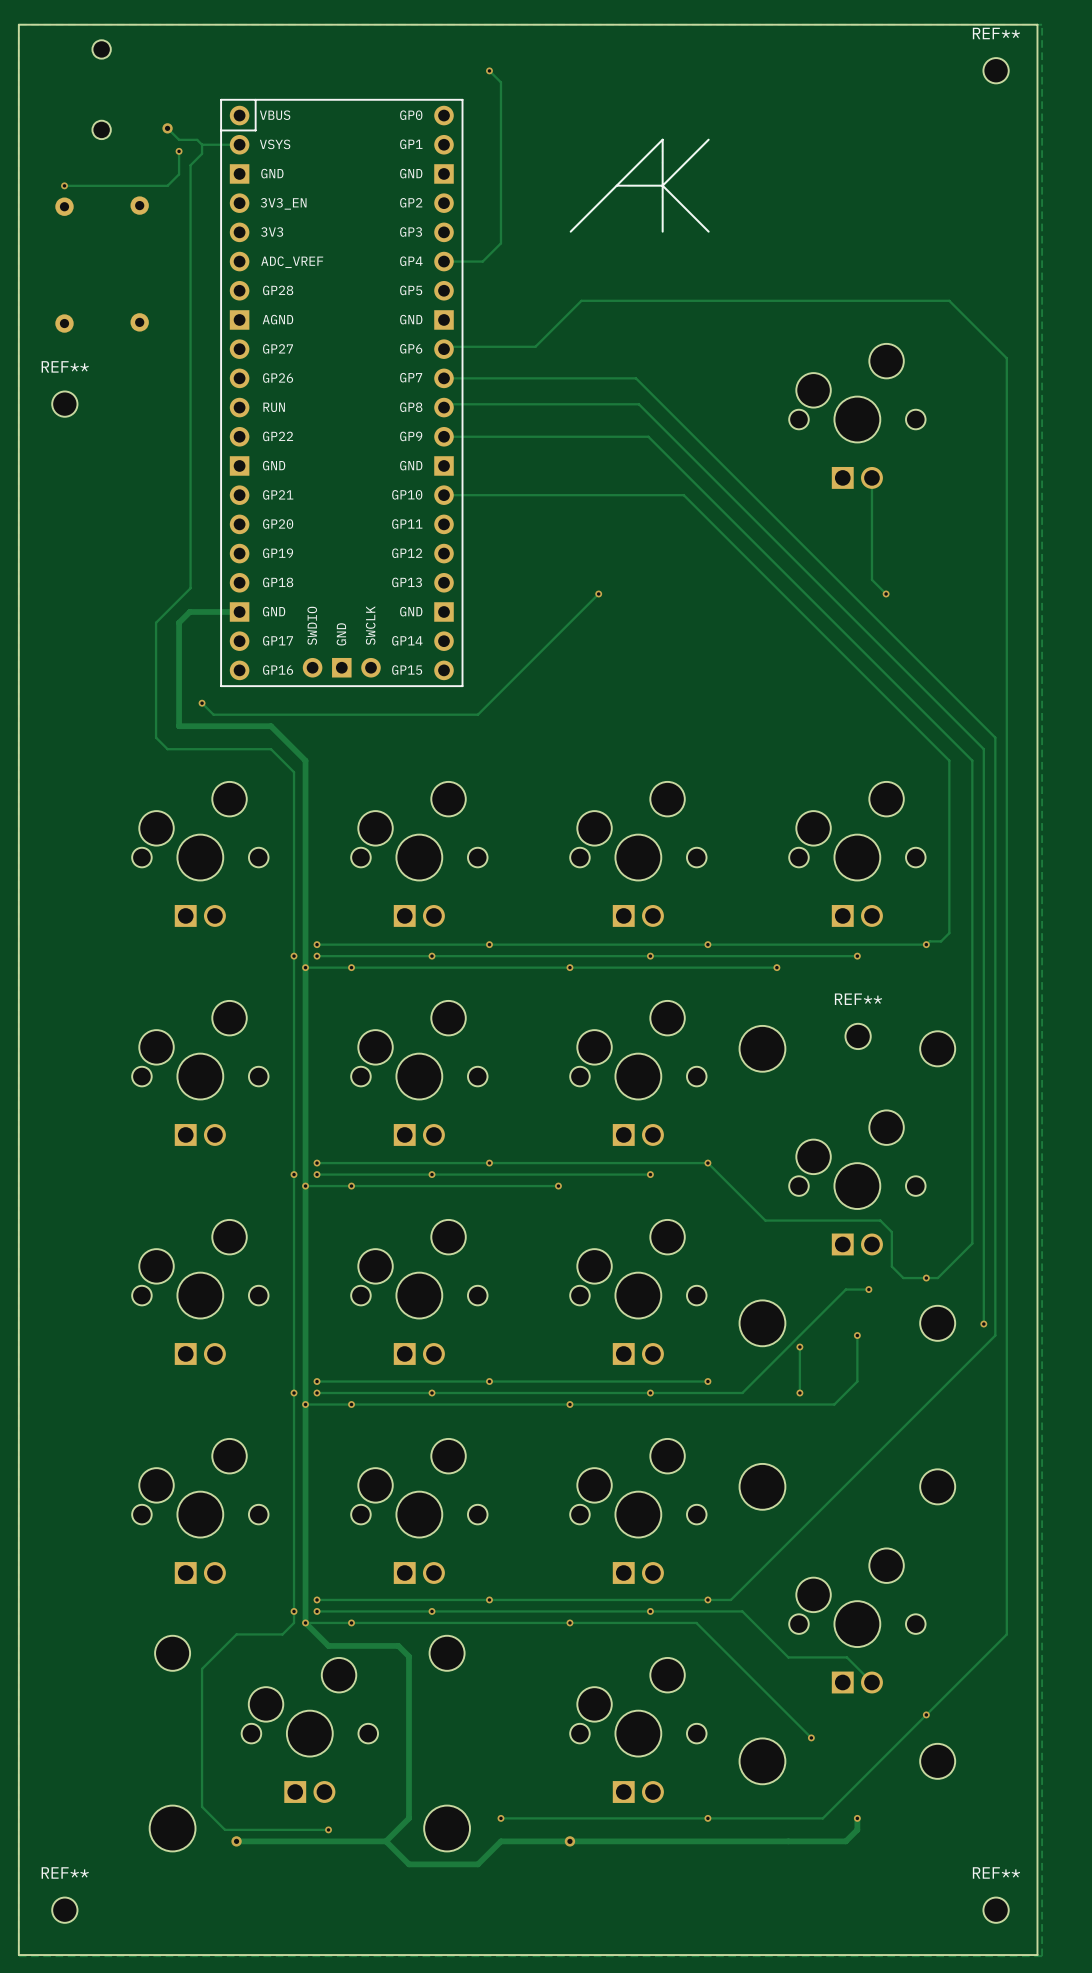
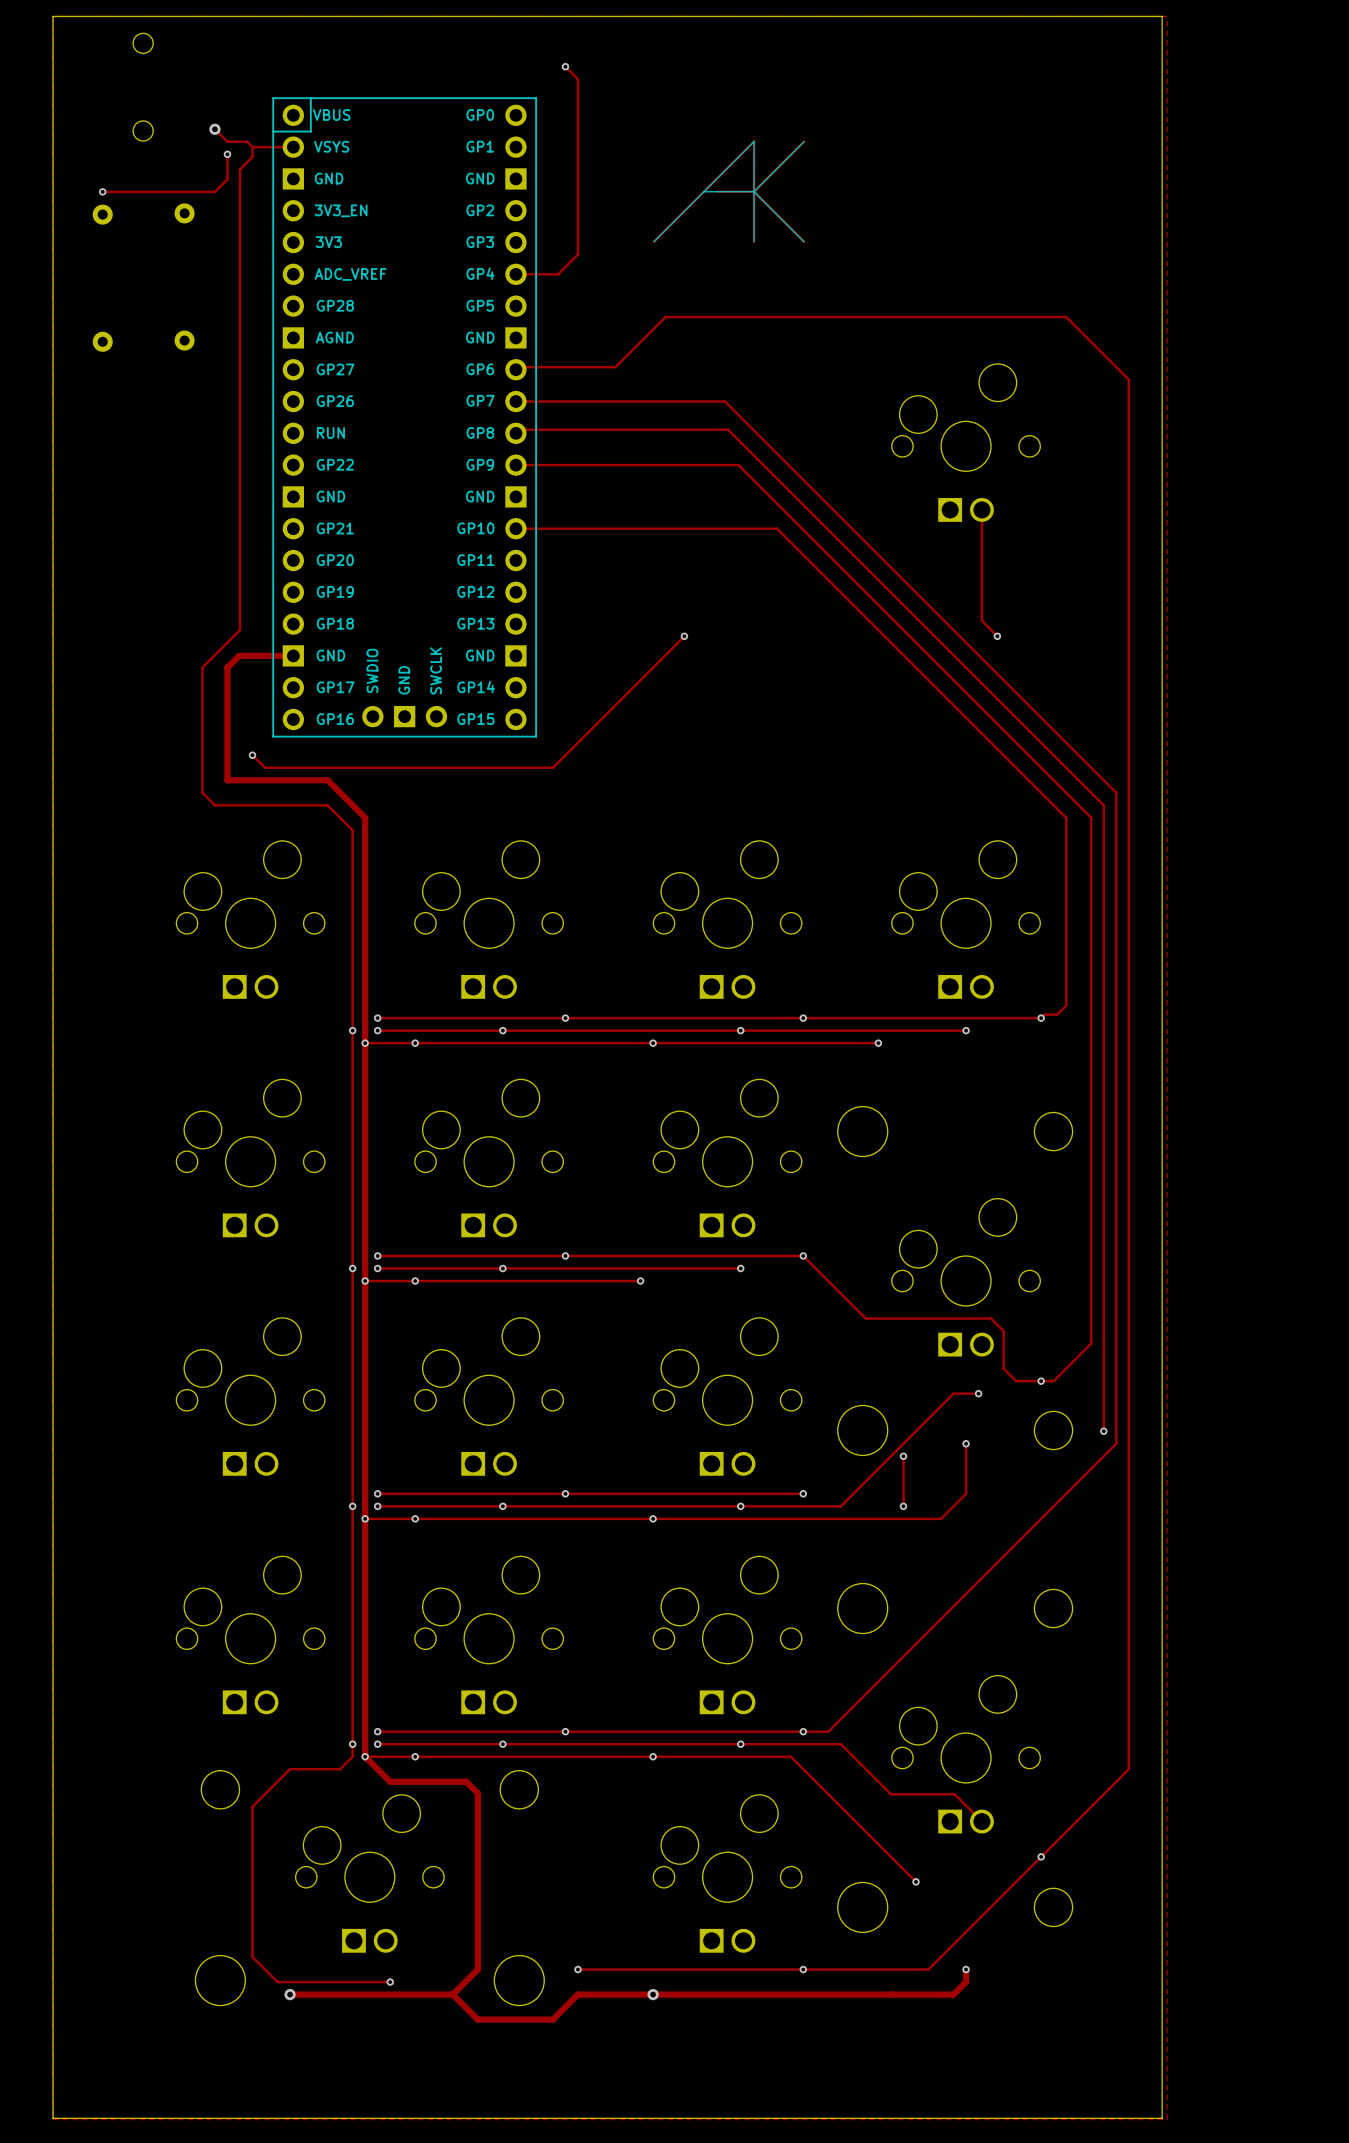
REF**: (996, 70) -> none
REF**: (64, 404) -> none
REF**: (858, 1036) -> none
REF**: (64, 1910) -> none
REF**: (996, 1910) -> none

